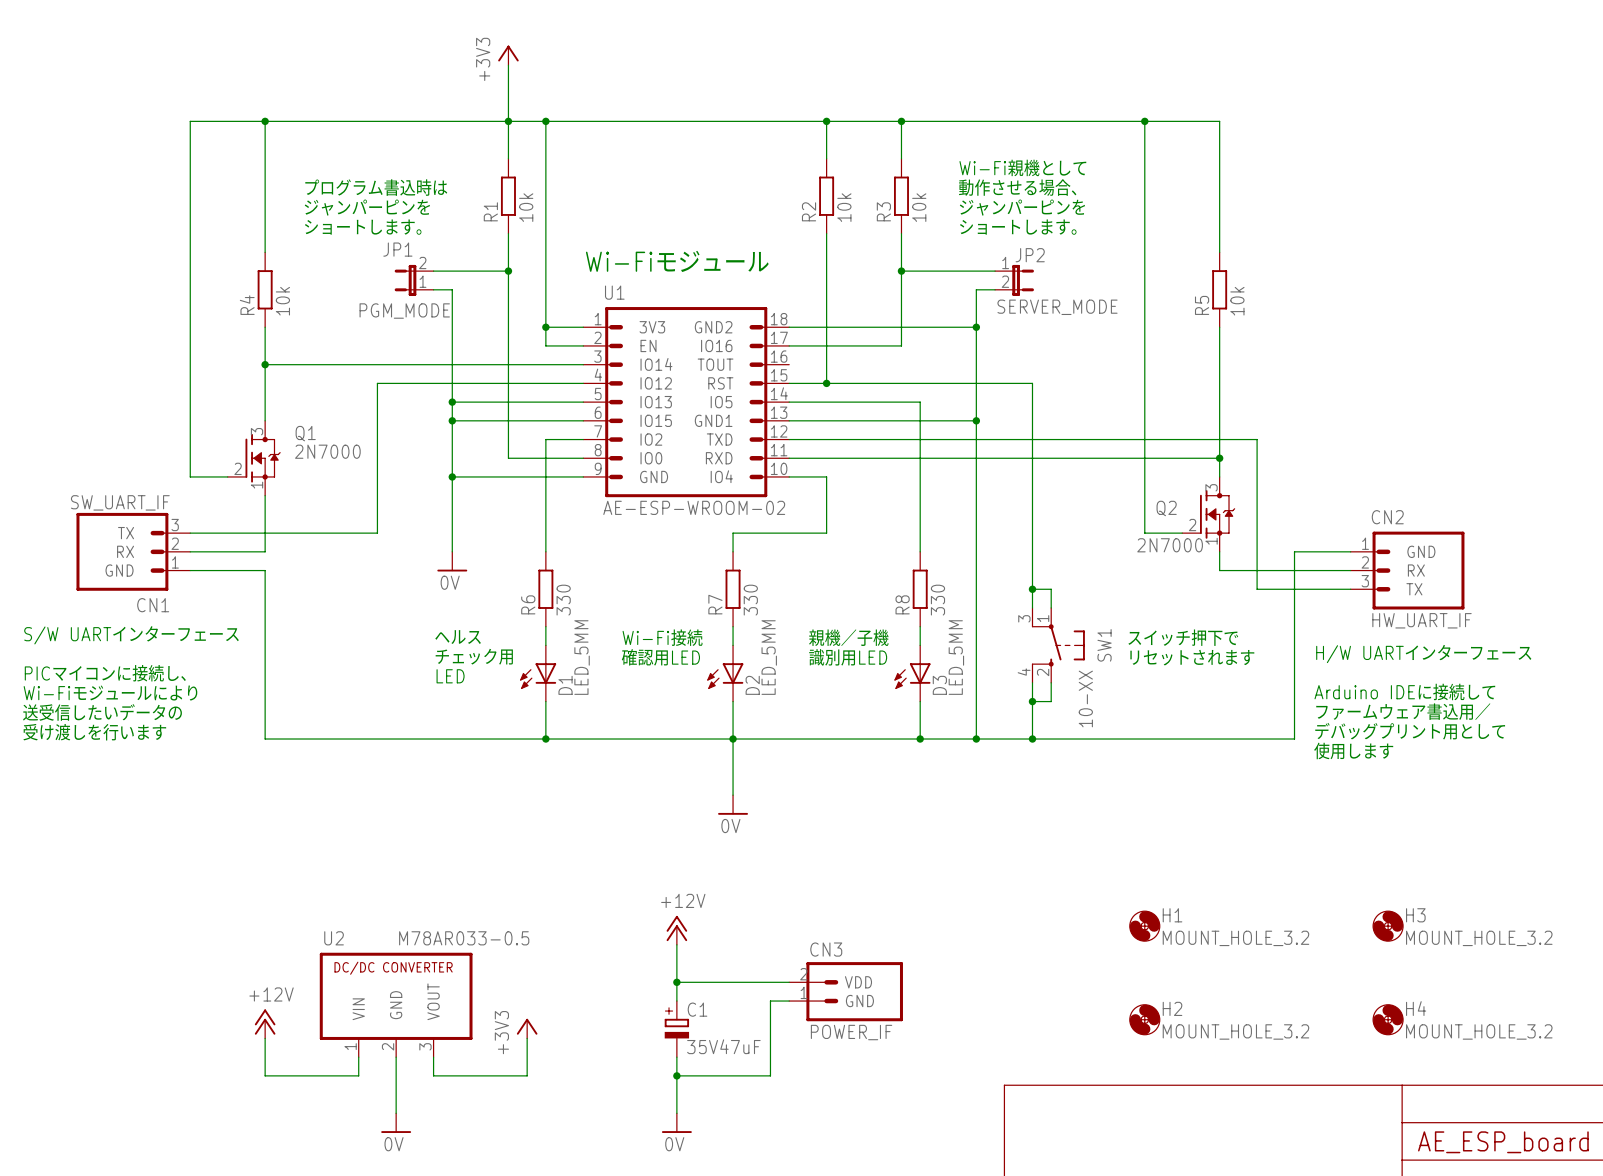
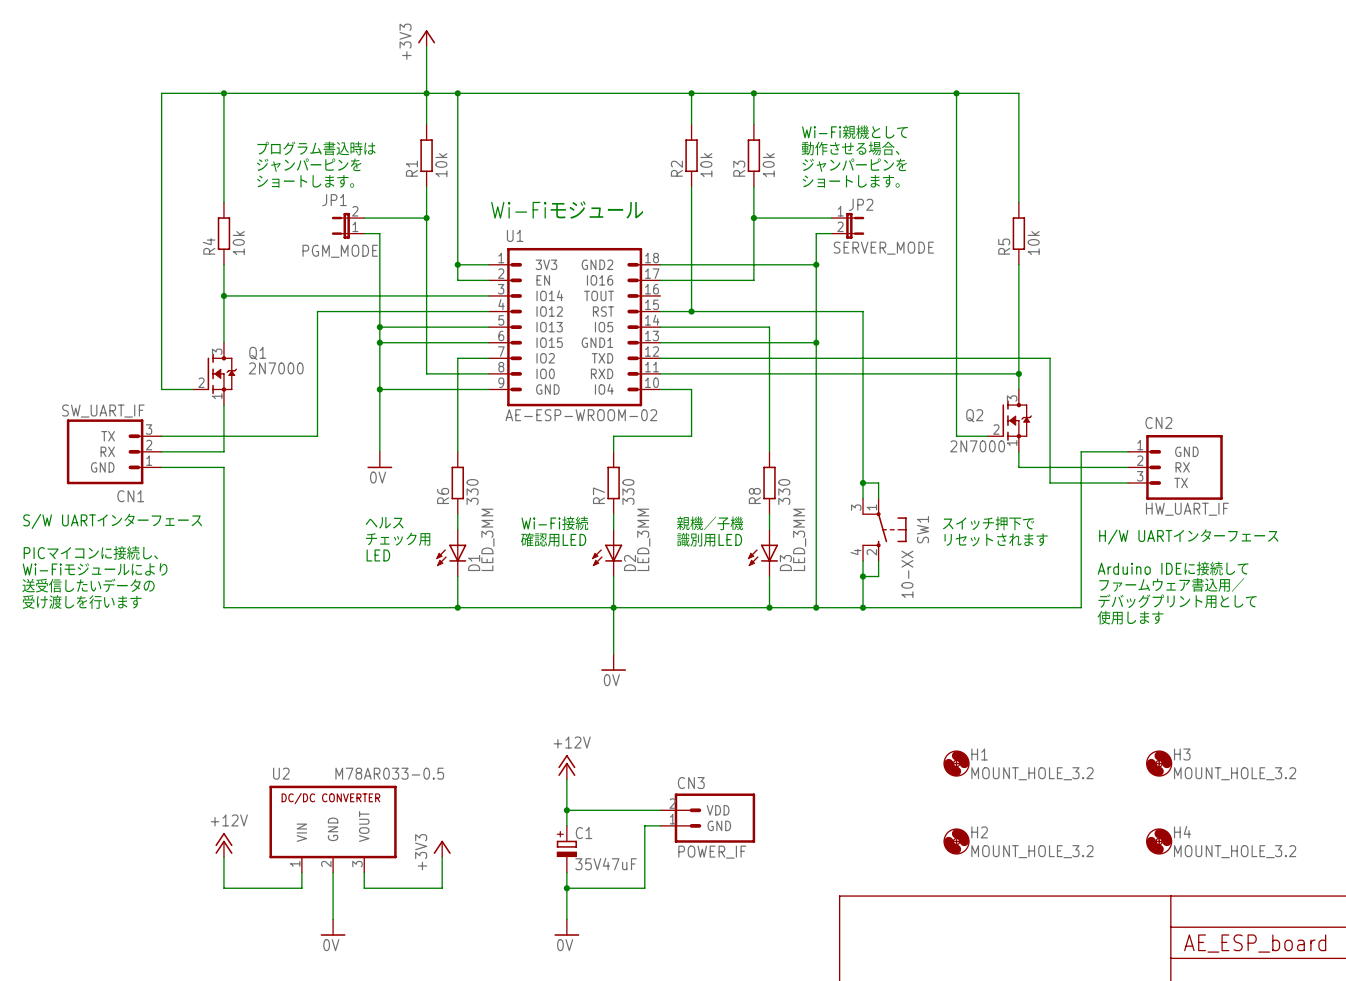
D1 value: LED_5MM (582, 657) -> LED_3MM (487, 539)
D2 value: LED_5MM (769, 657) -> LED_3MM (643, 539)
D3 value: LED_5MM (956, 657) -> LED_3MM (799, 539)

